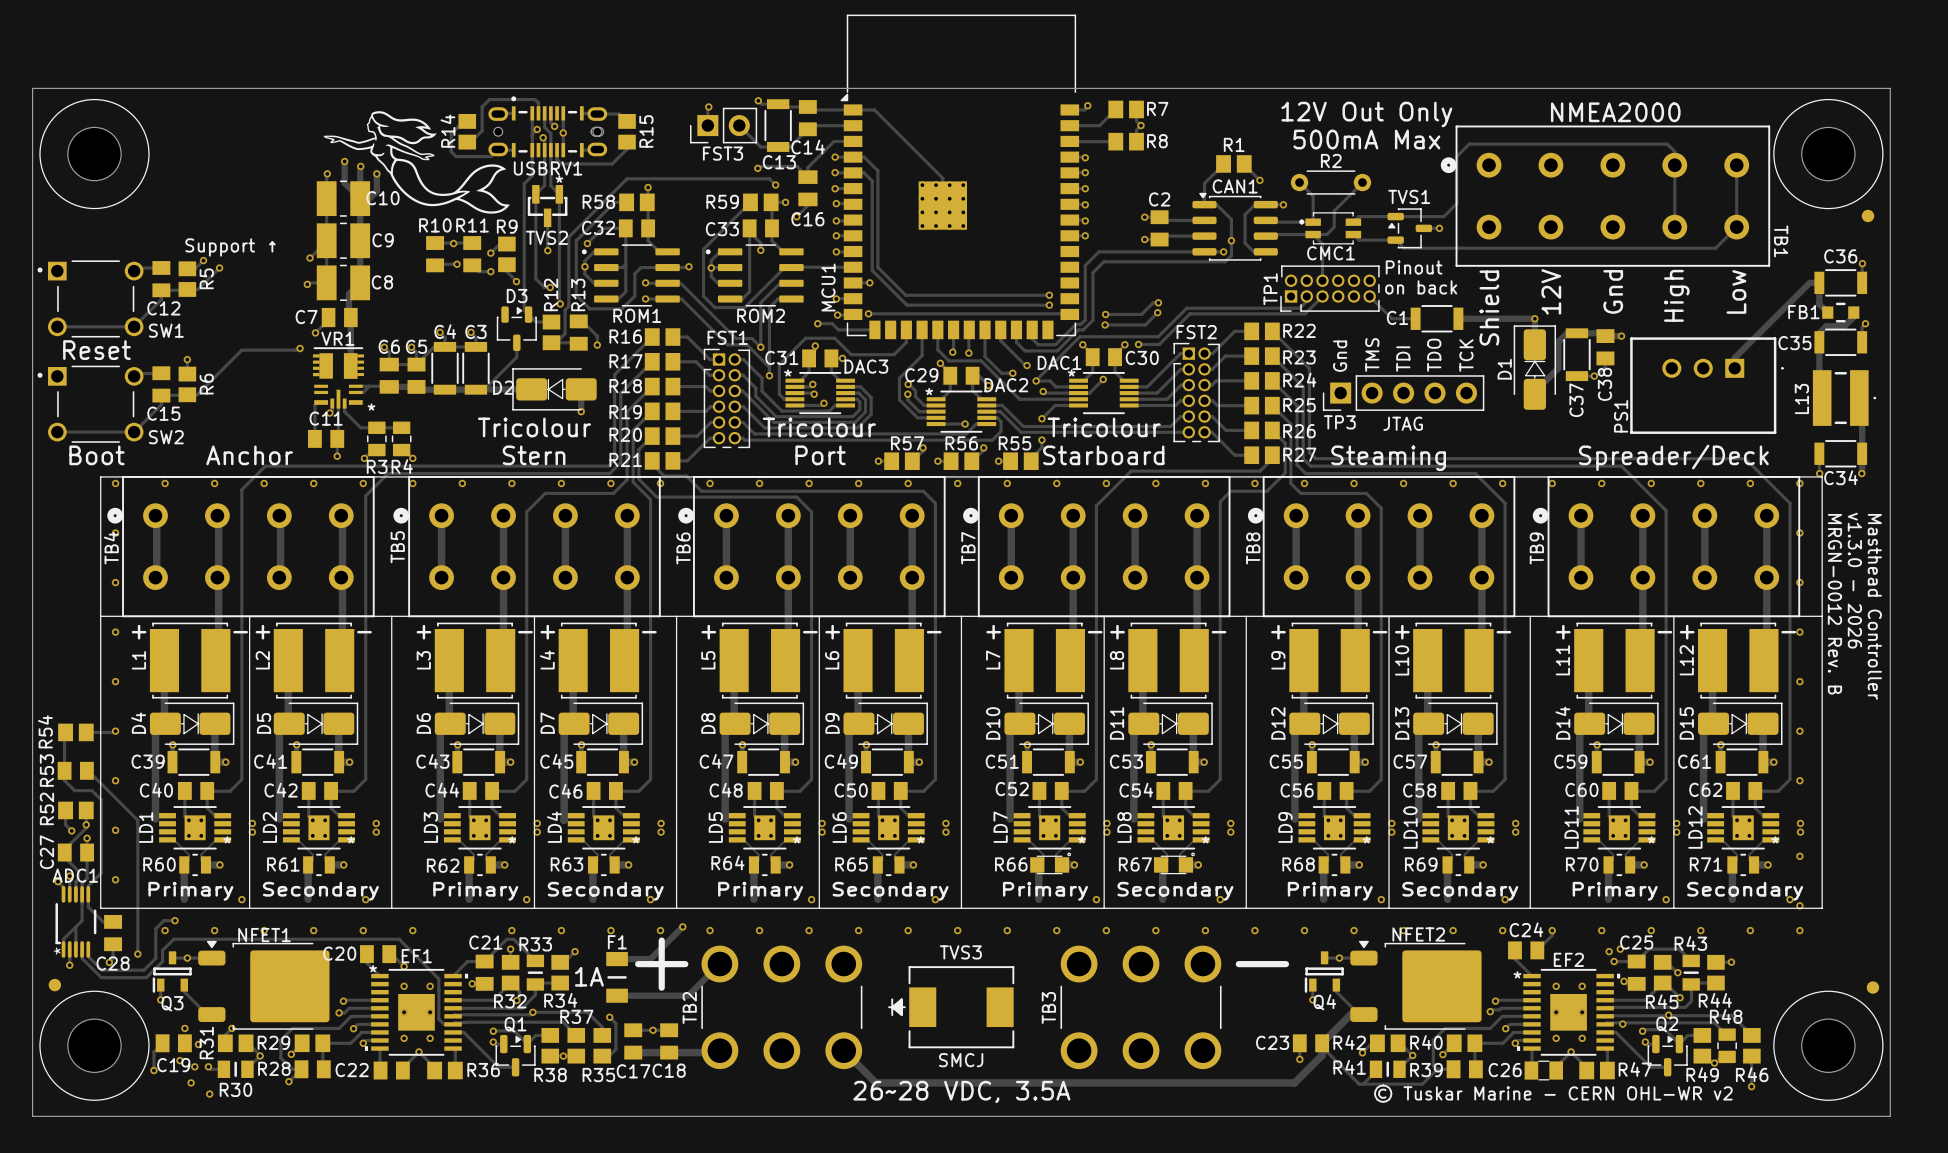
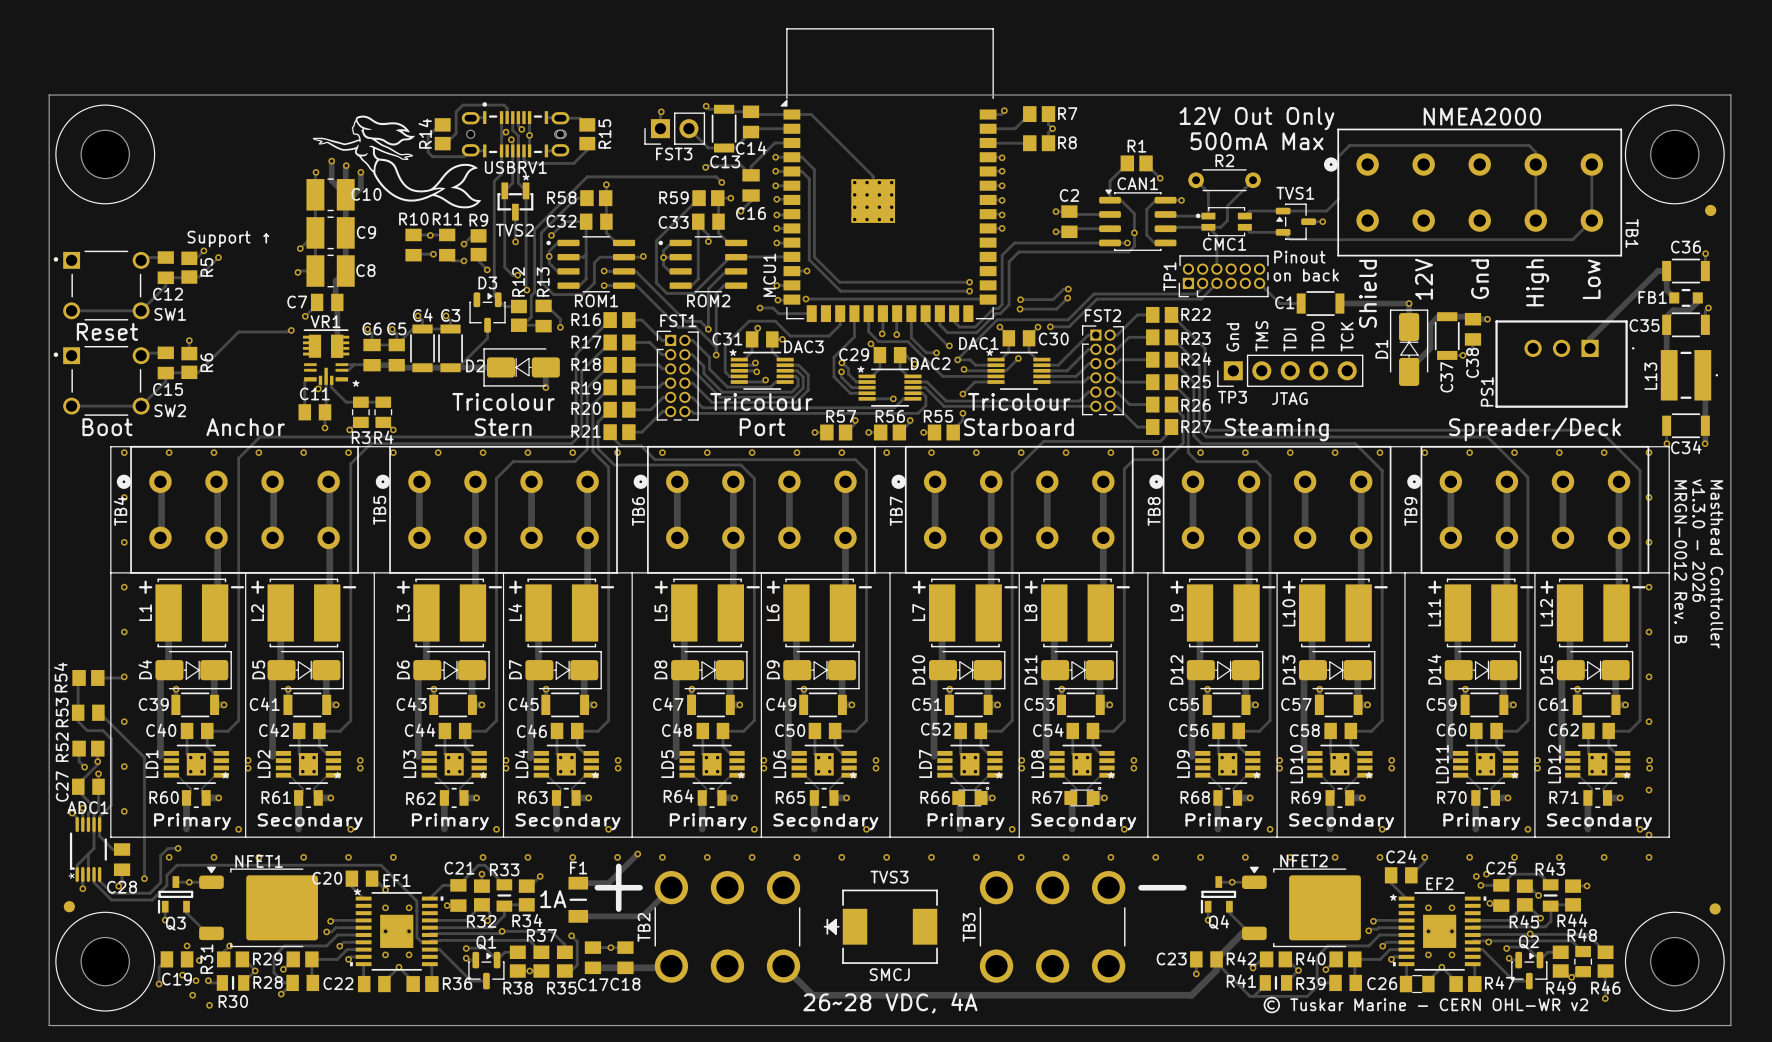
text: 26~28 VDC, 3.5A (961, 1091) -> 26~28 VDC, 4A (890, 1003)

